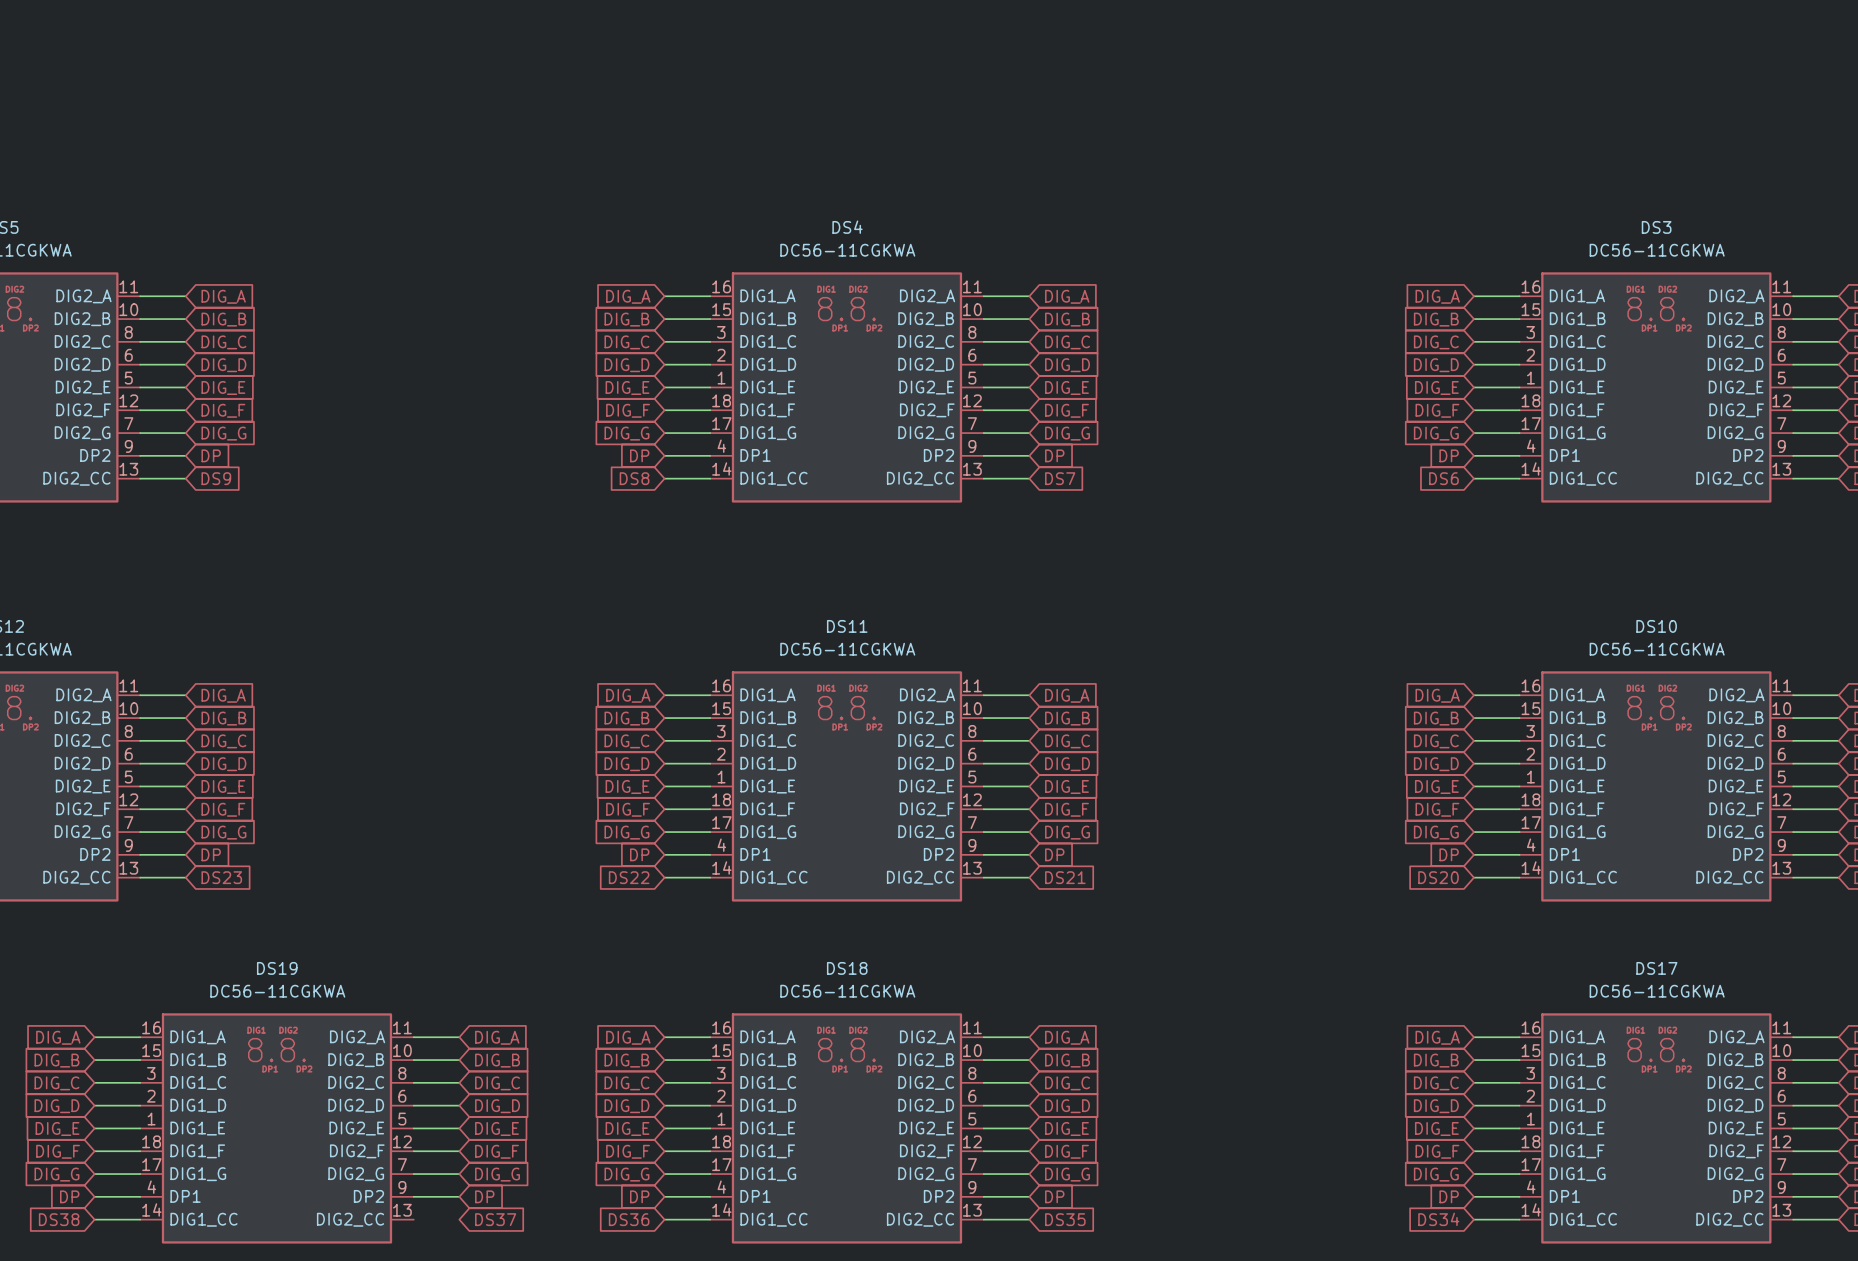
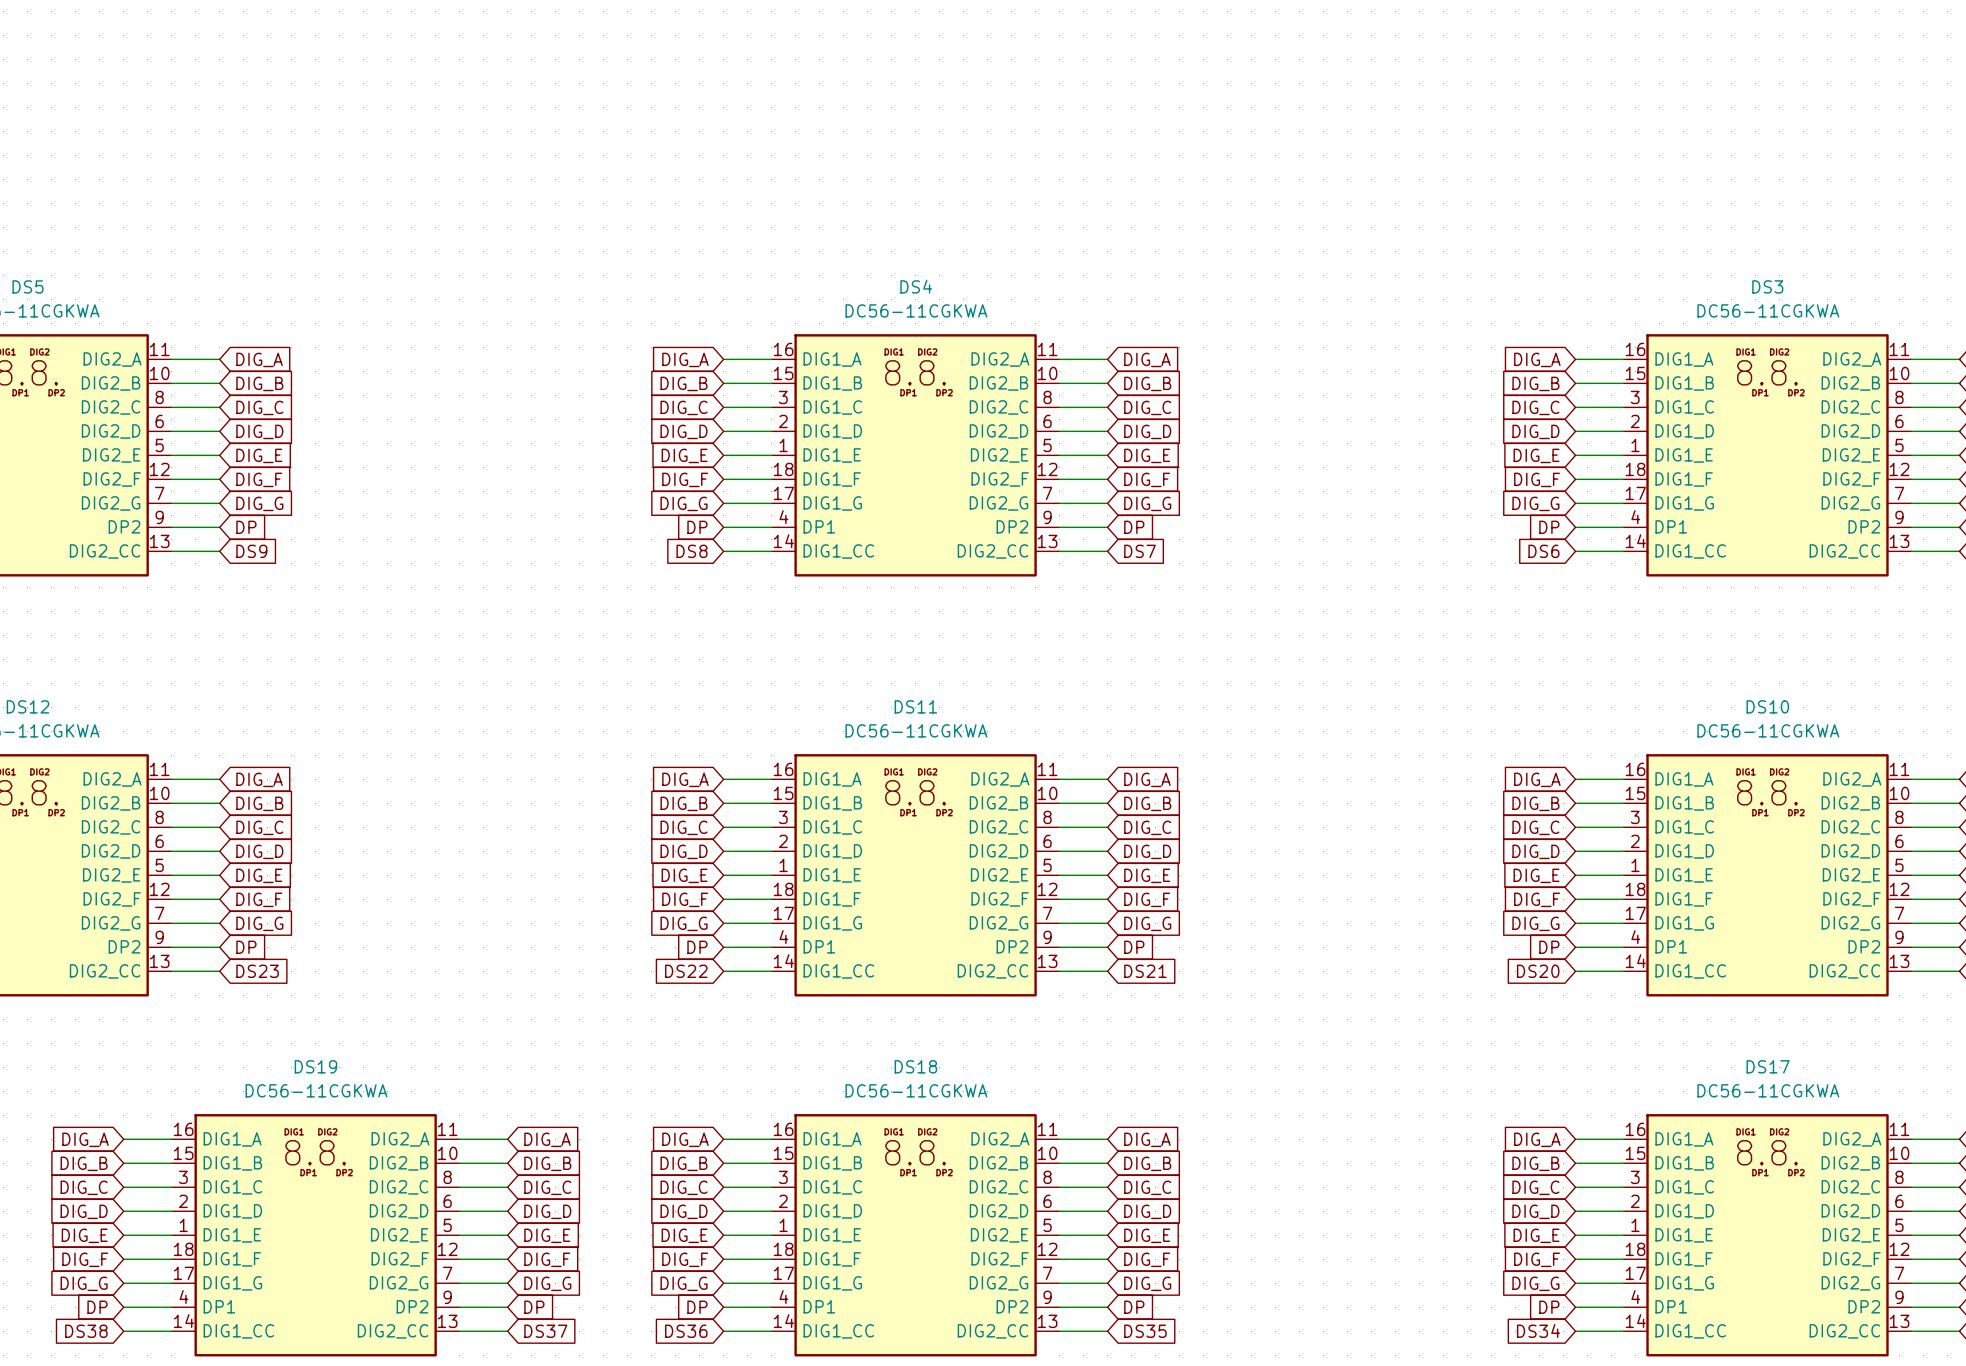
wire: none -> (459, 1331) (507, 1331)

